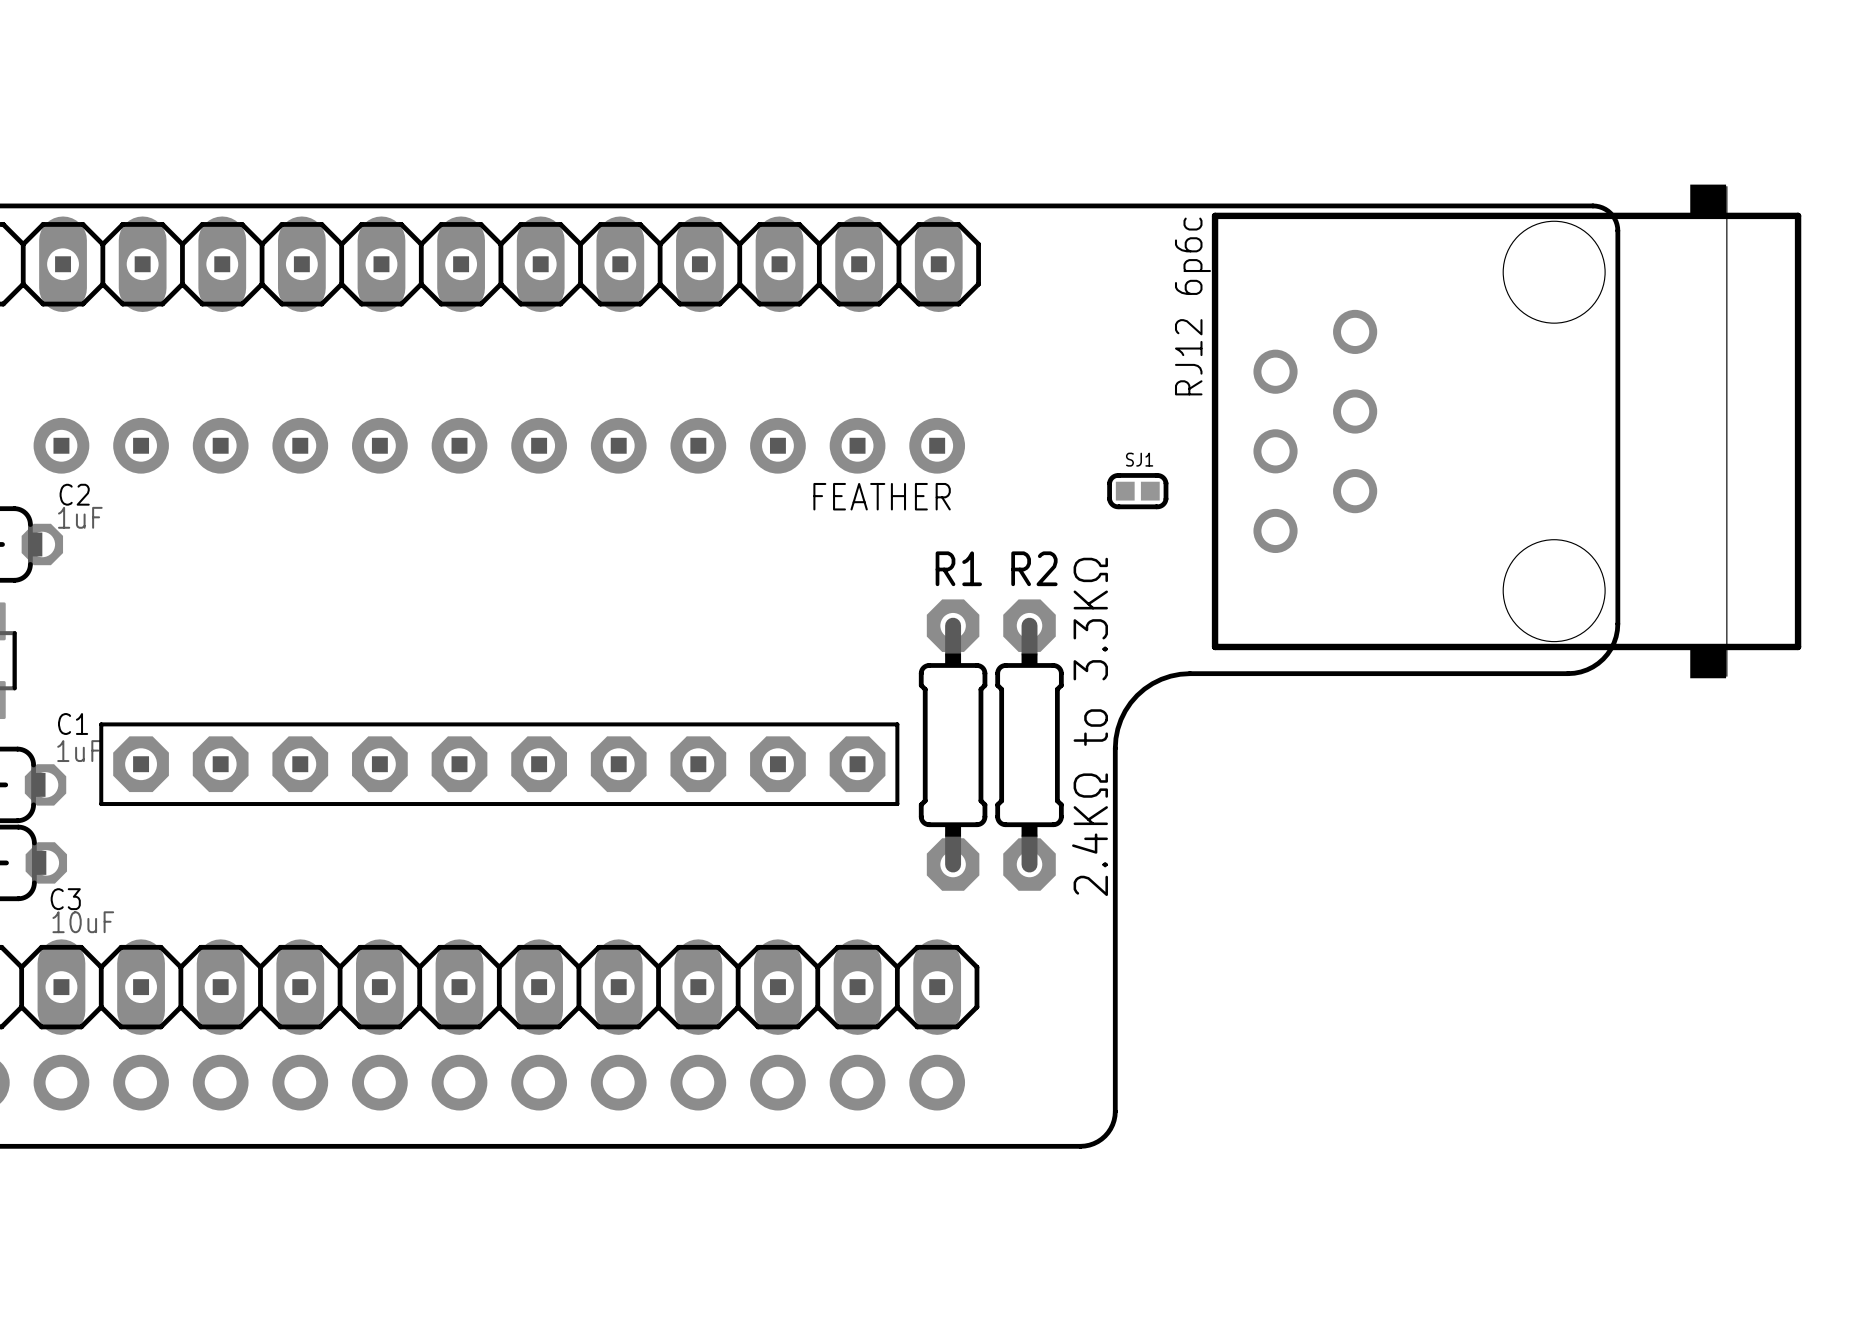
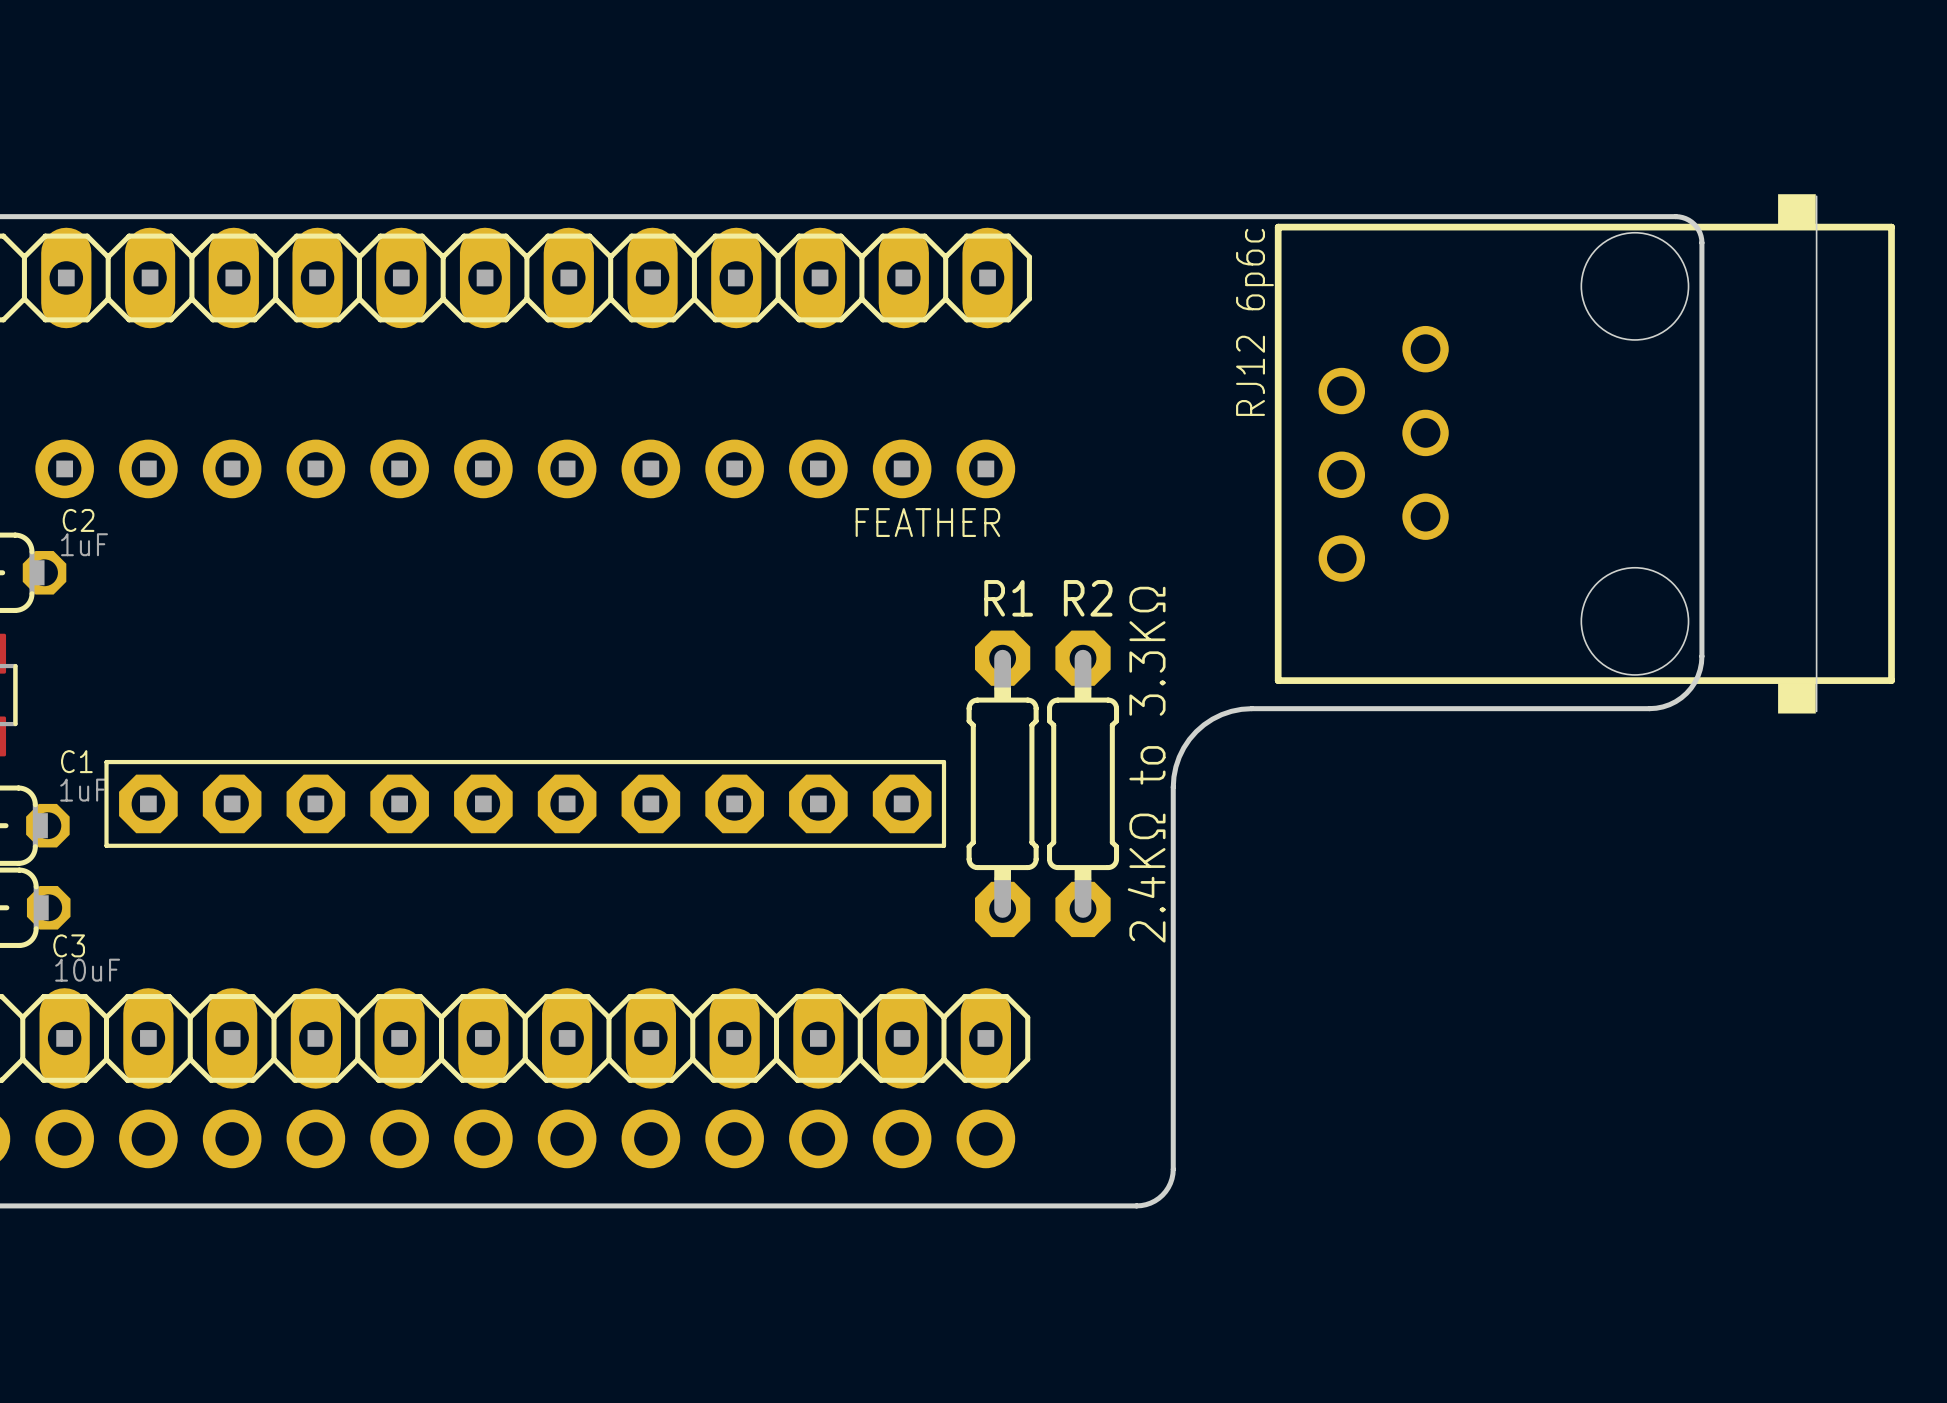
SJ1: (1137, 491) -> none

